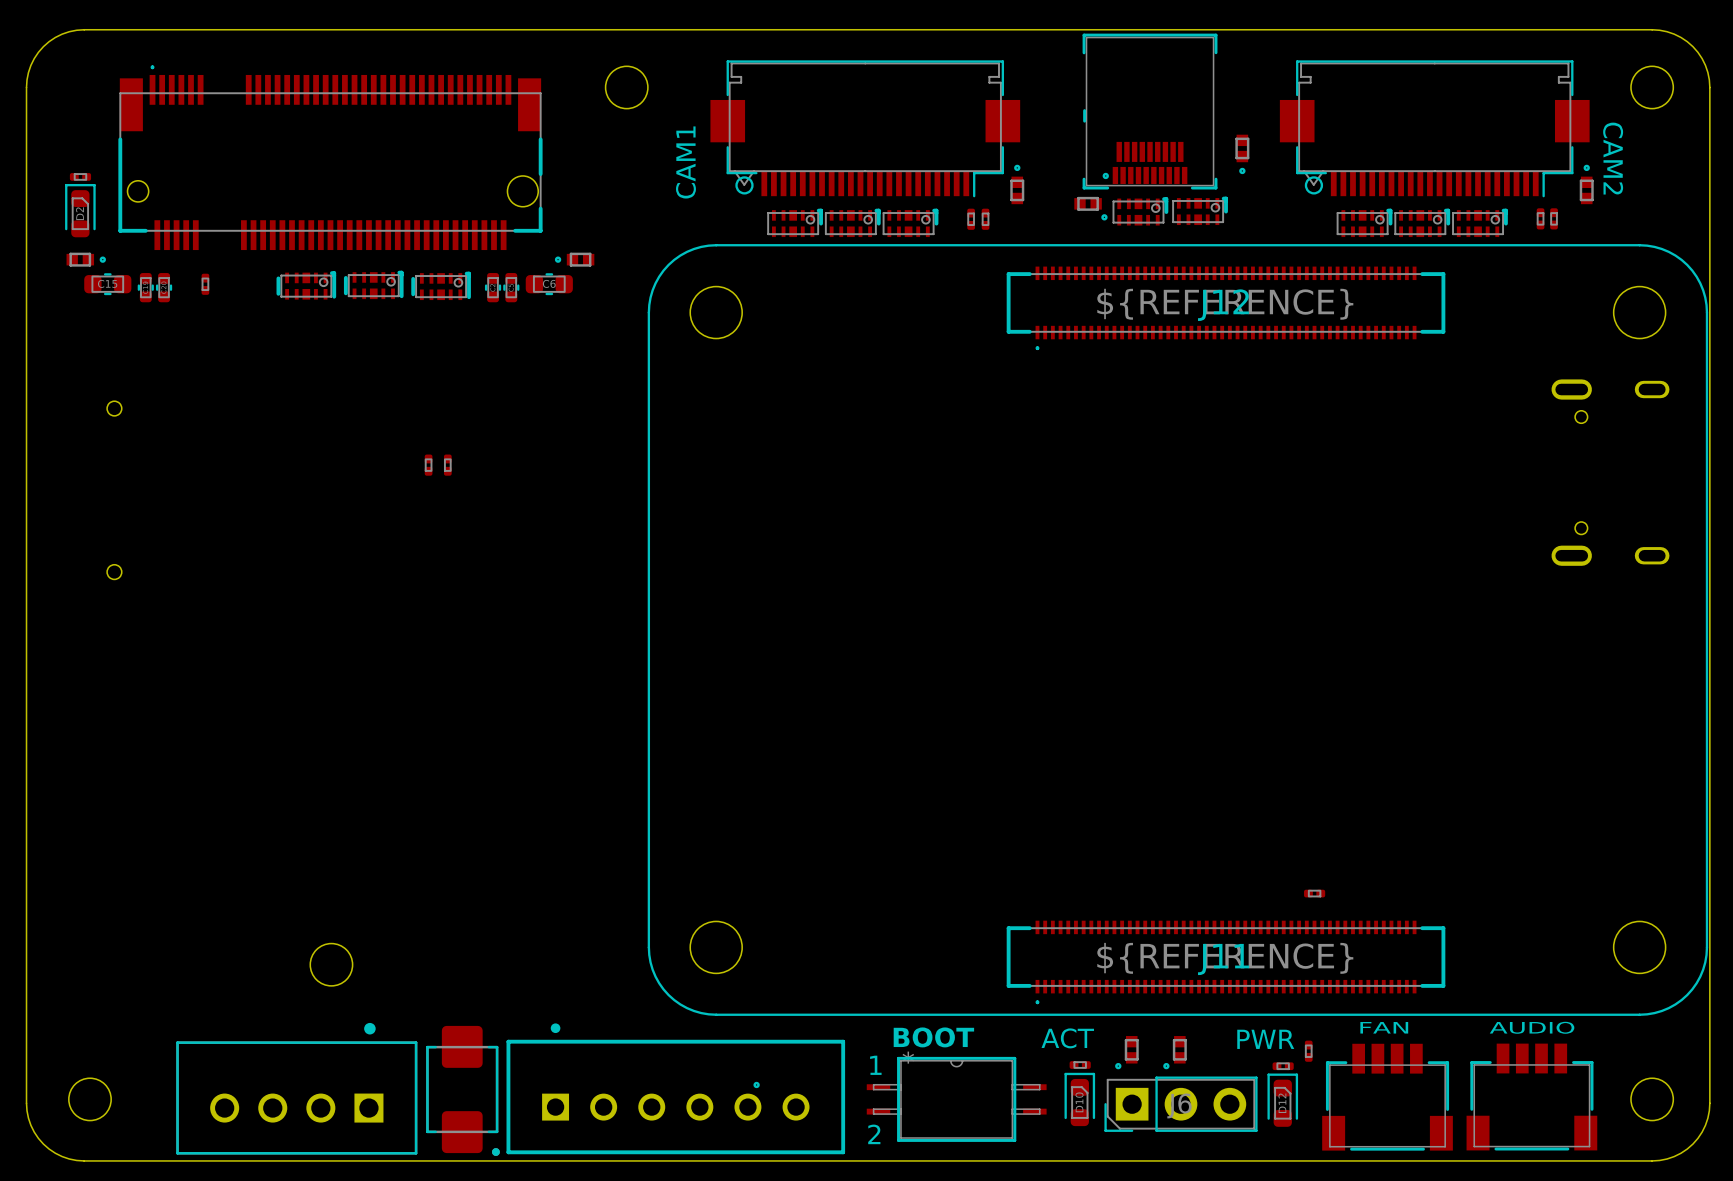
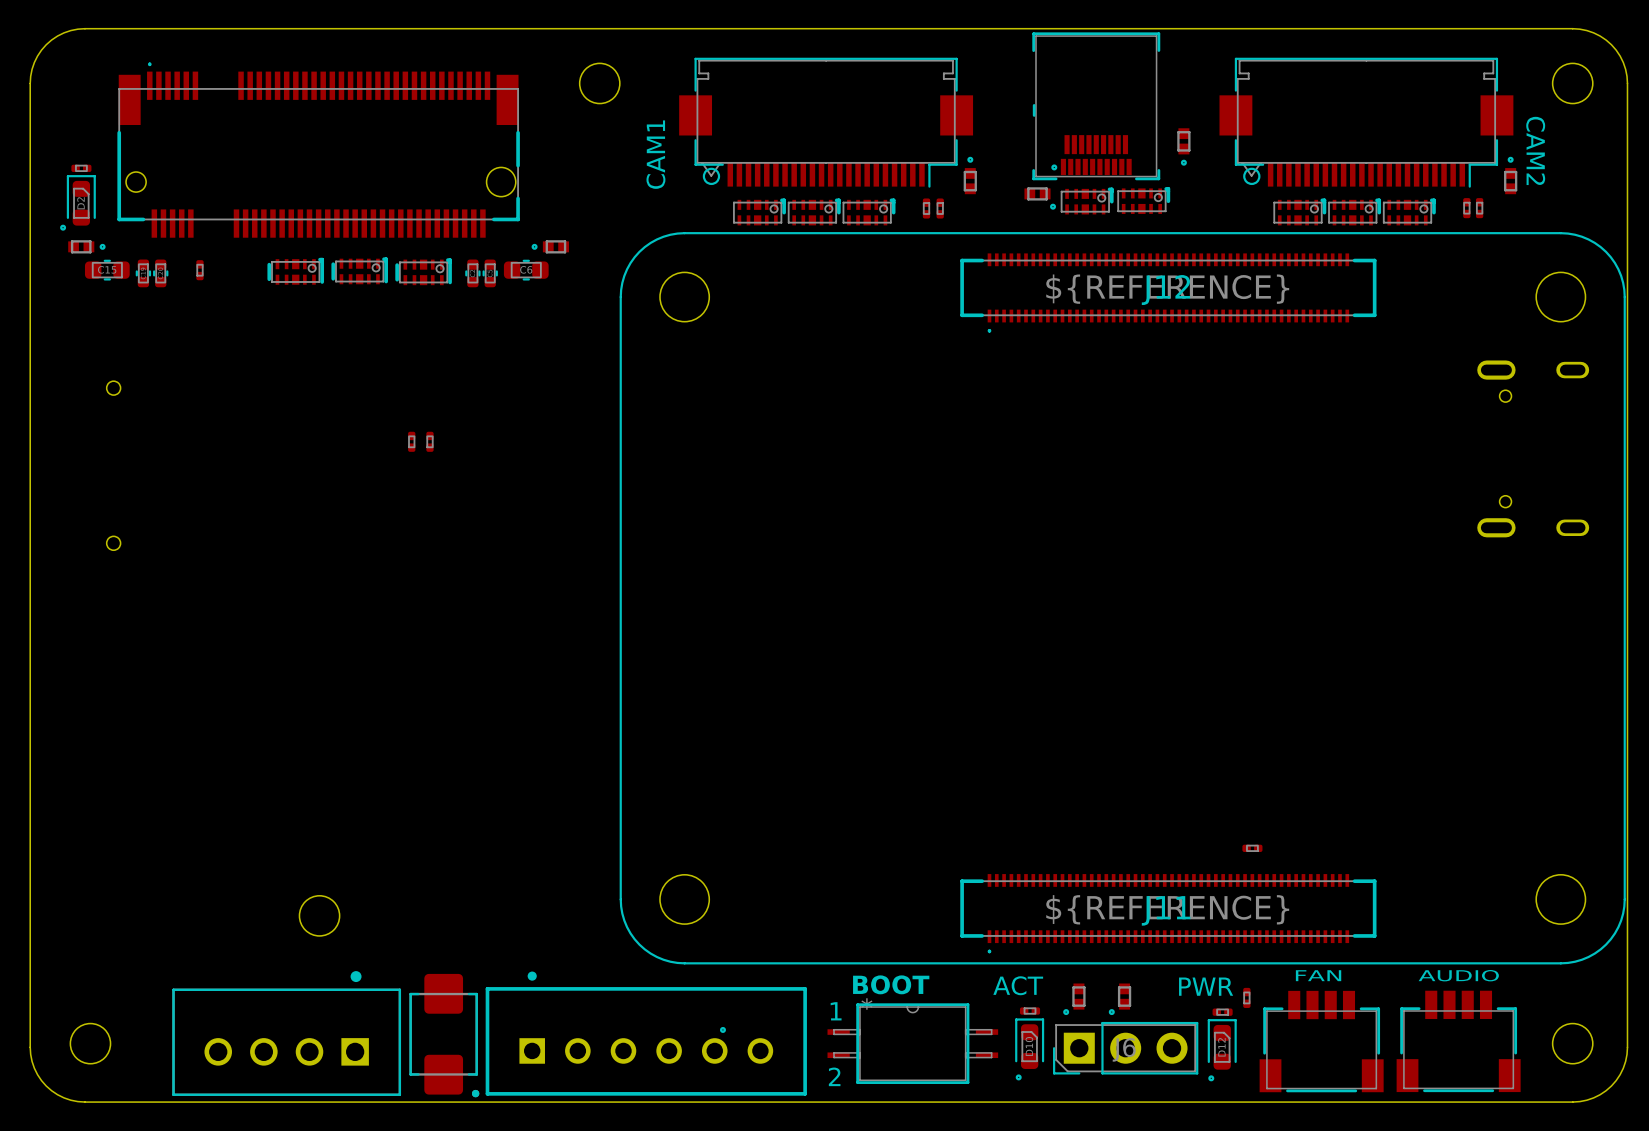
drawing: none -> [60, 224, 67, 231]
drawing: none -> [1015, 1074, 1022, 1081]
drawing: none -> [1208, 1075, 1215, 1082]

